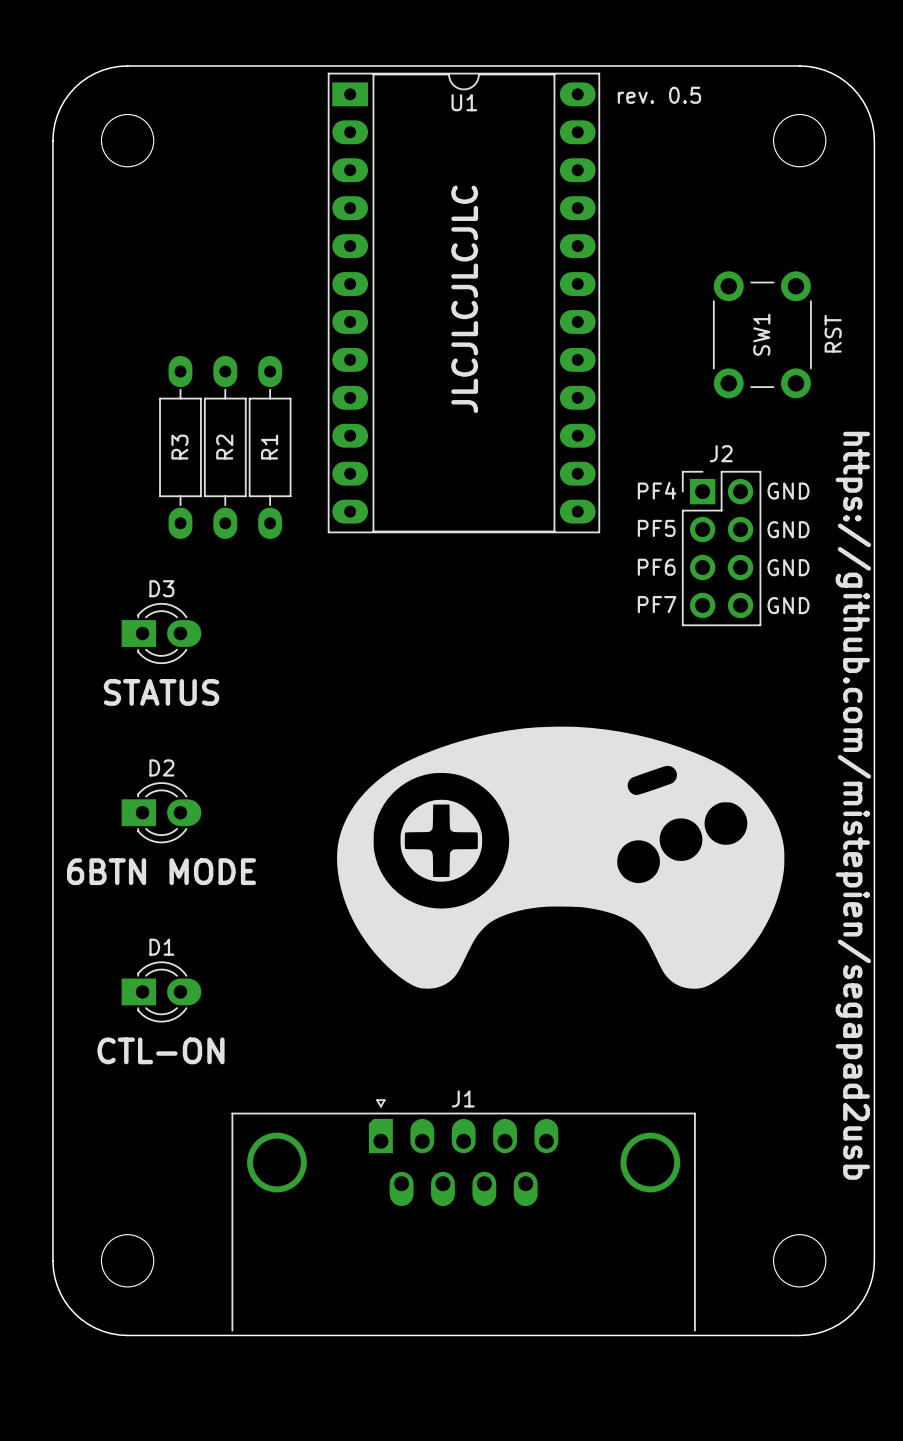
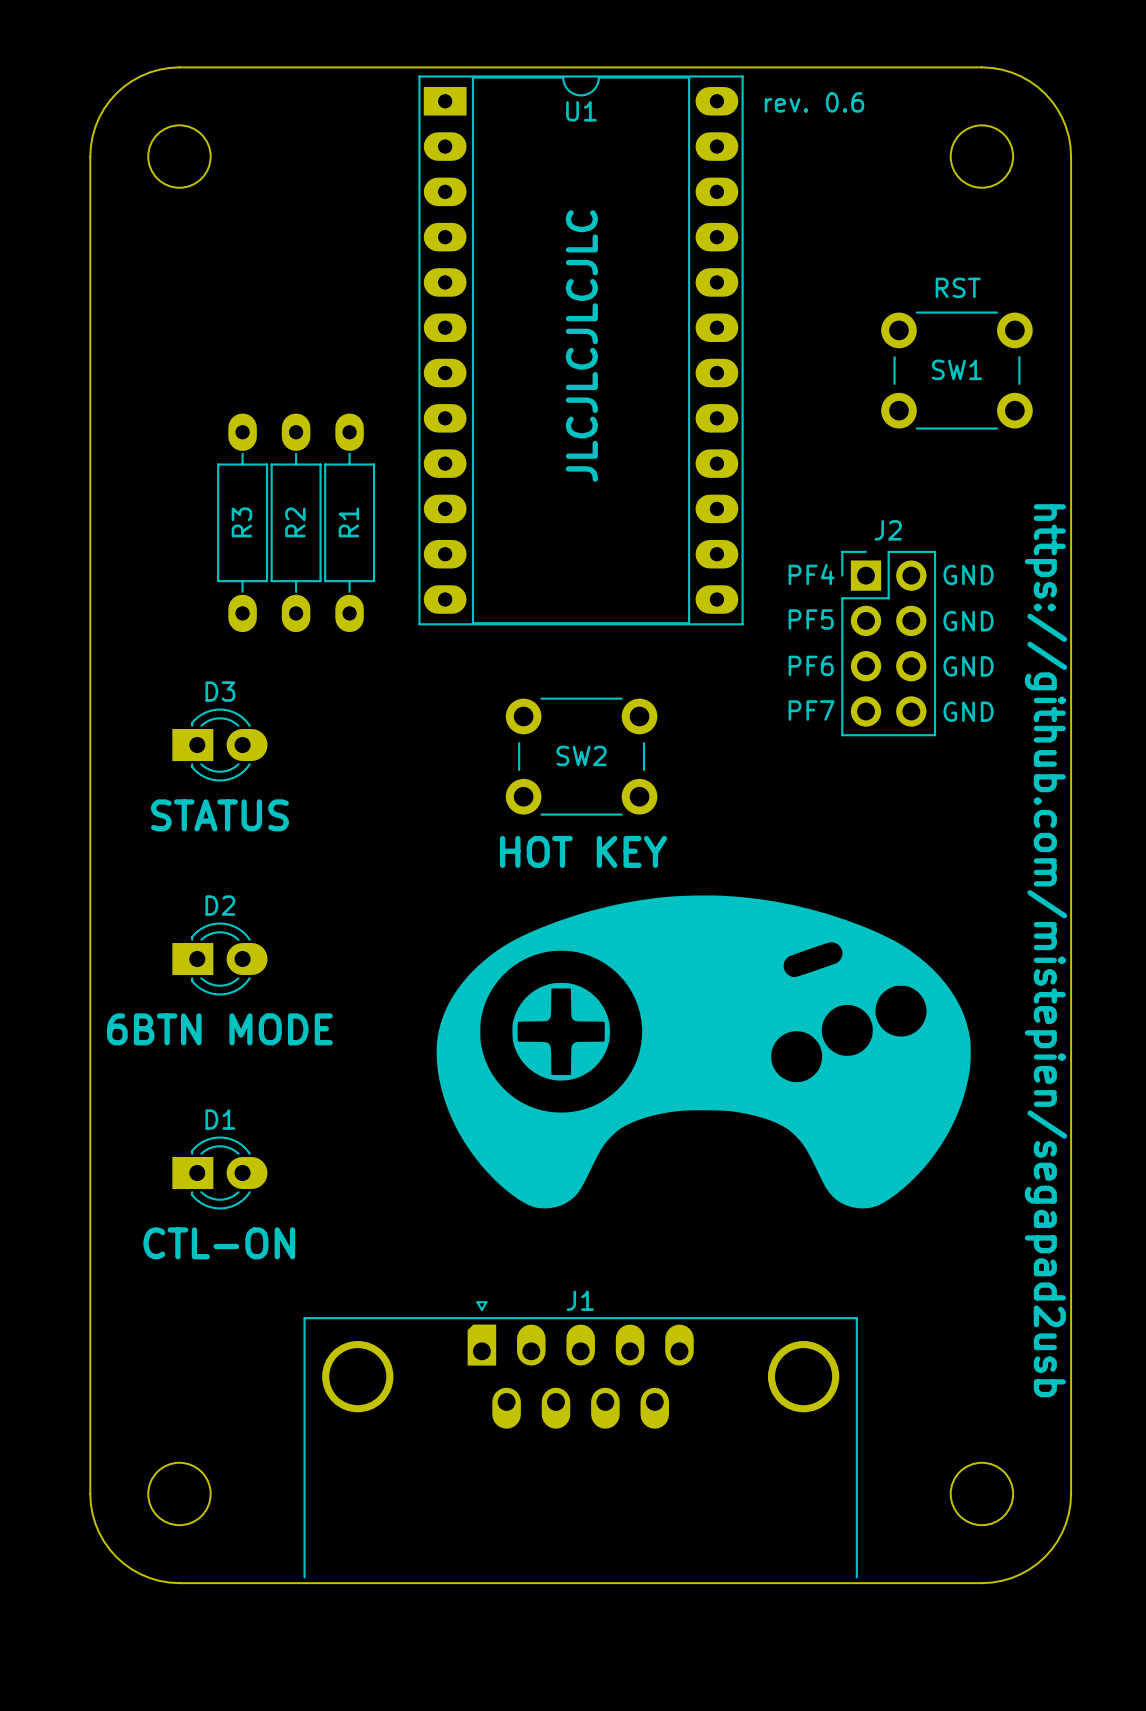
text: rev. 0.5 (659, 95) -> rev. 0.6 (814, 102)
SW1 value position: RST (833, 333) -> RST (958, 287)
SW1 rotation: 0° (762, 334) -> 90° clockwise (956, 370)
SW2: none -> HOT KEY (581, 756)
drawing position: (560, 857) -> (703, 1051)

